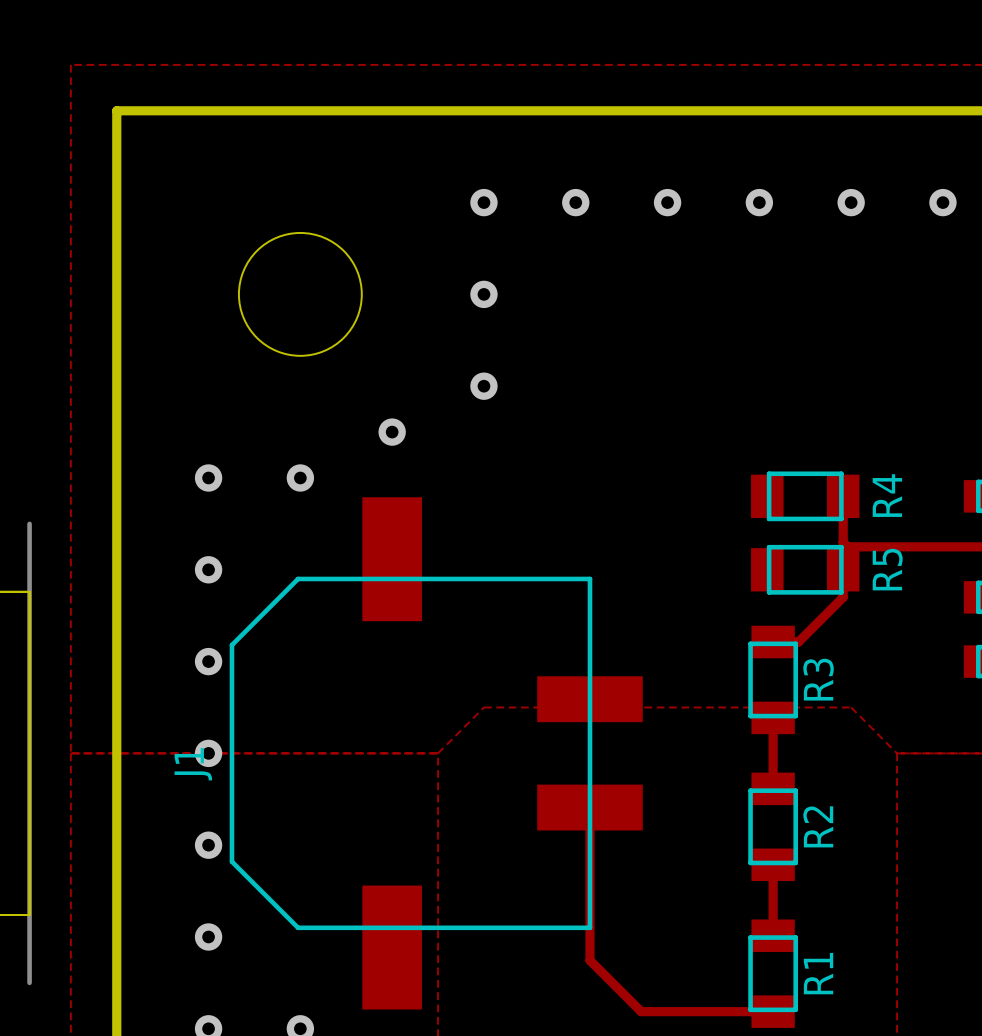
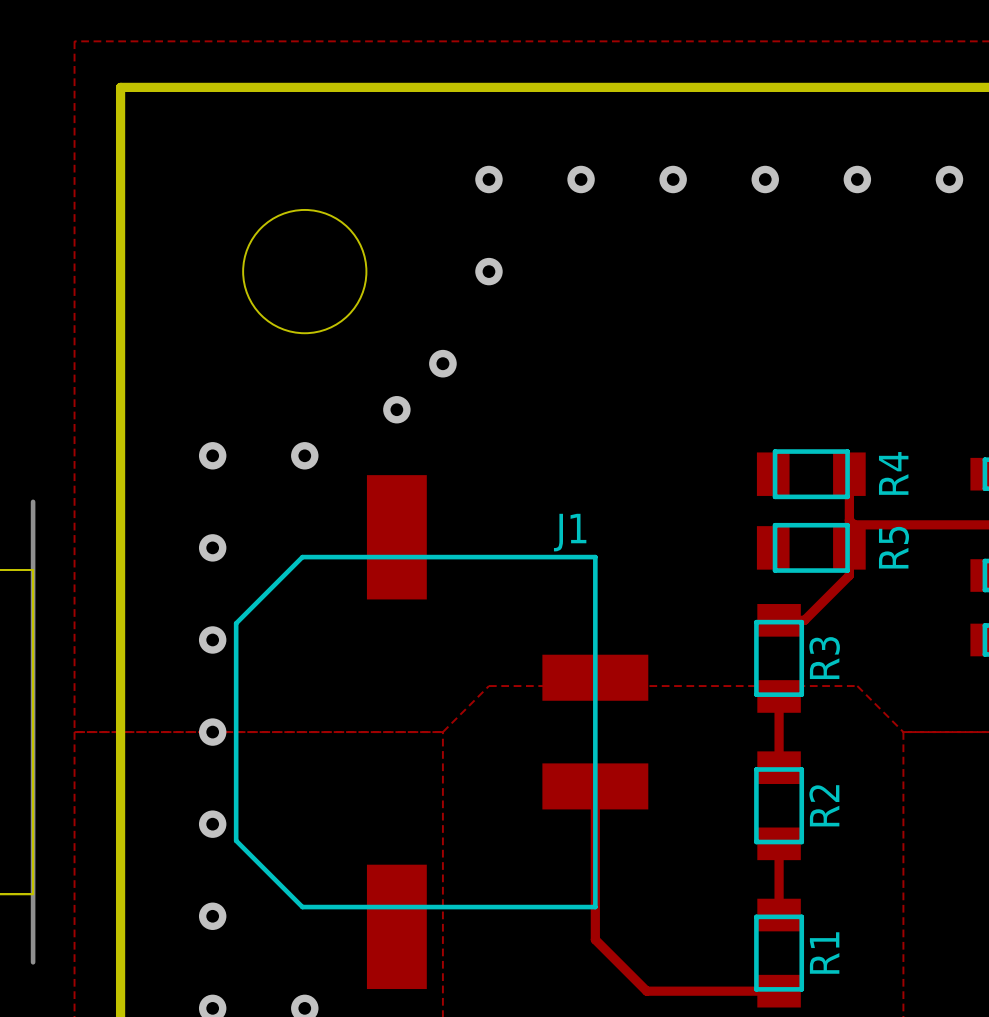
via: none -> (442, 363)
via: (483, 386) -> none
J1 name rotation: 0° (193, 764) -> 90° clockwise (570, 532)
J1 name position: J1 (193, 764) -> J1 (570, 532)

